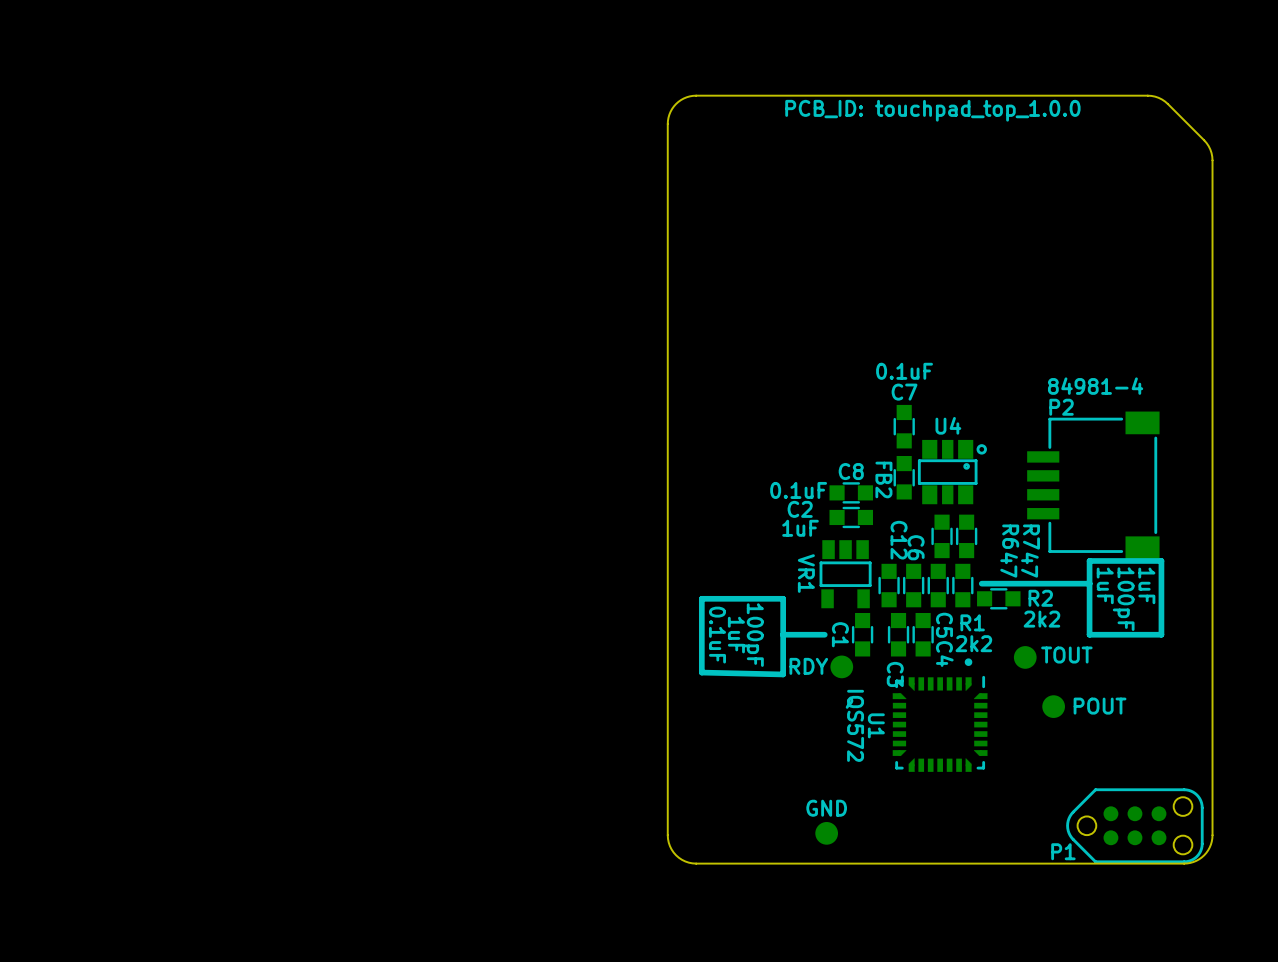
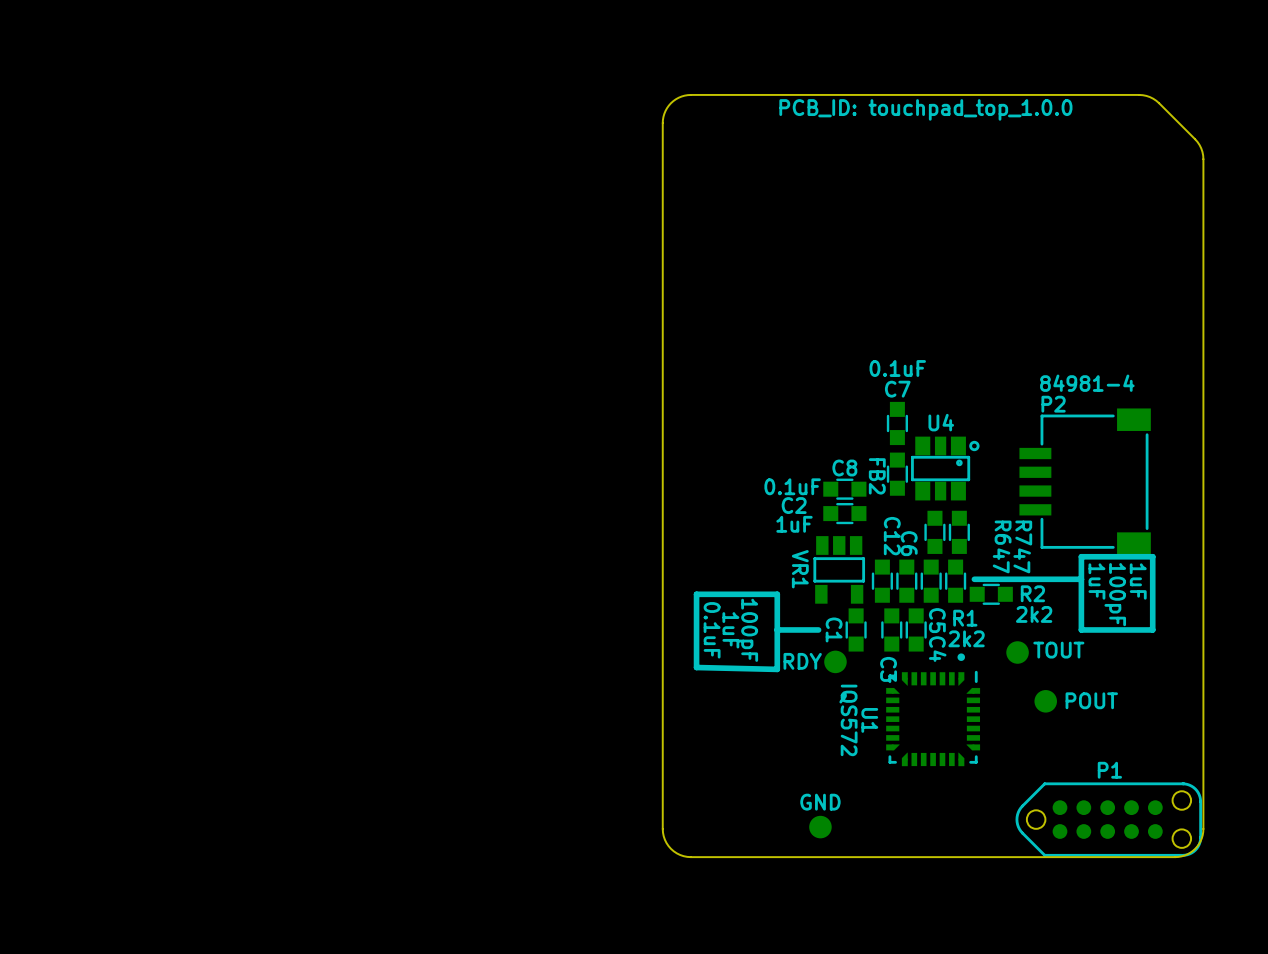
P1 footprint: [1066, 788, 1204, 864] -> [1015, 782, 1203, 857]
P1 name position: P1 (1063, 851) -> P1 (1109, 770)

